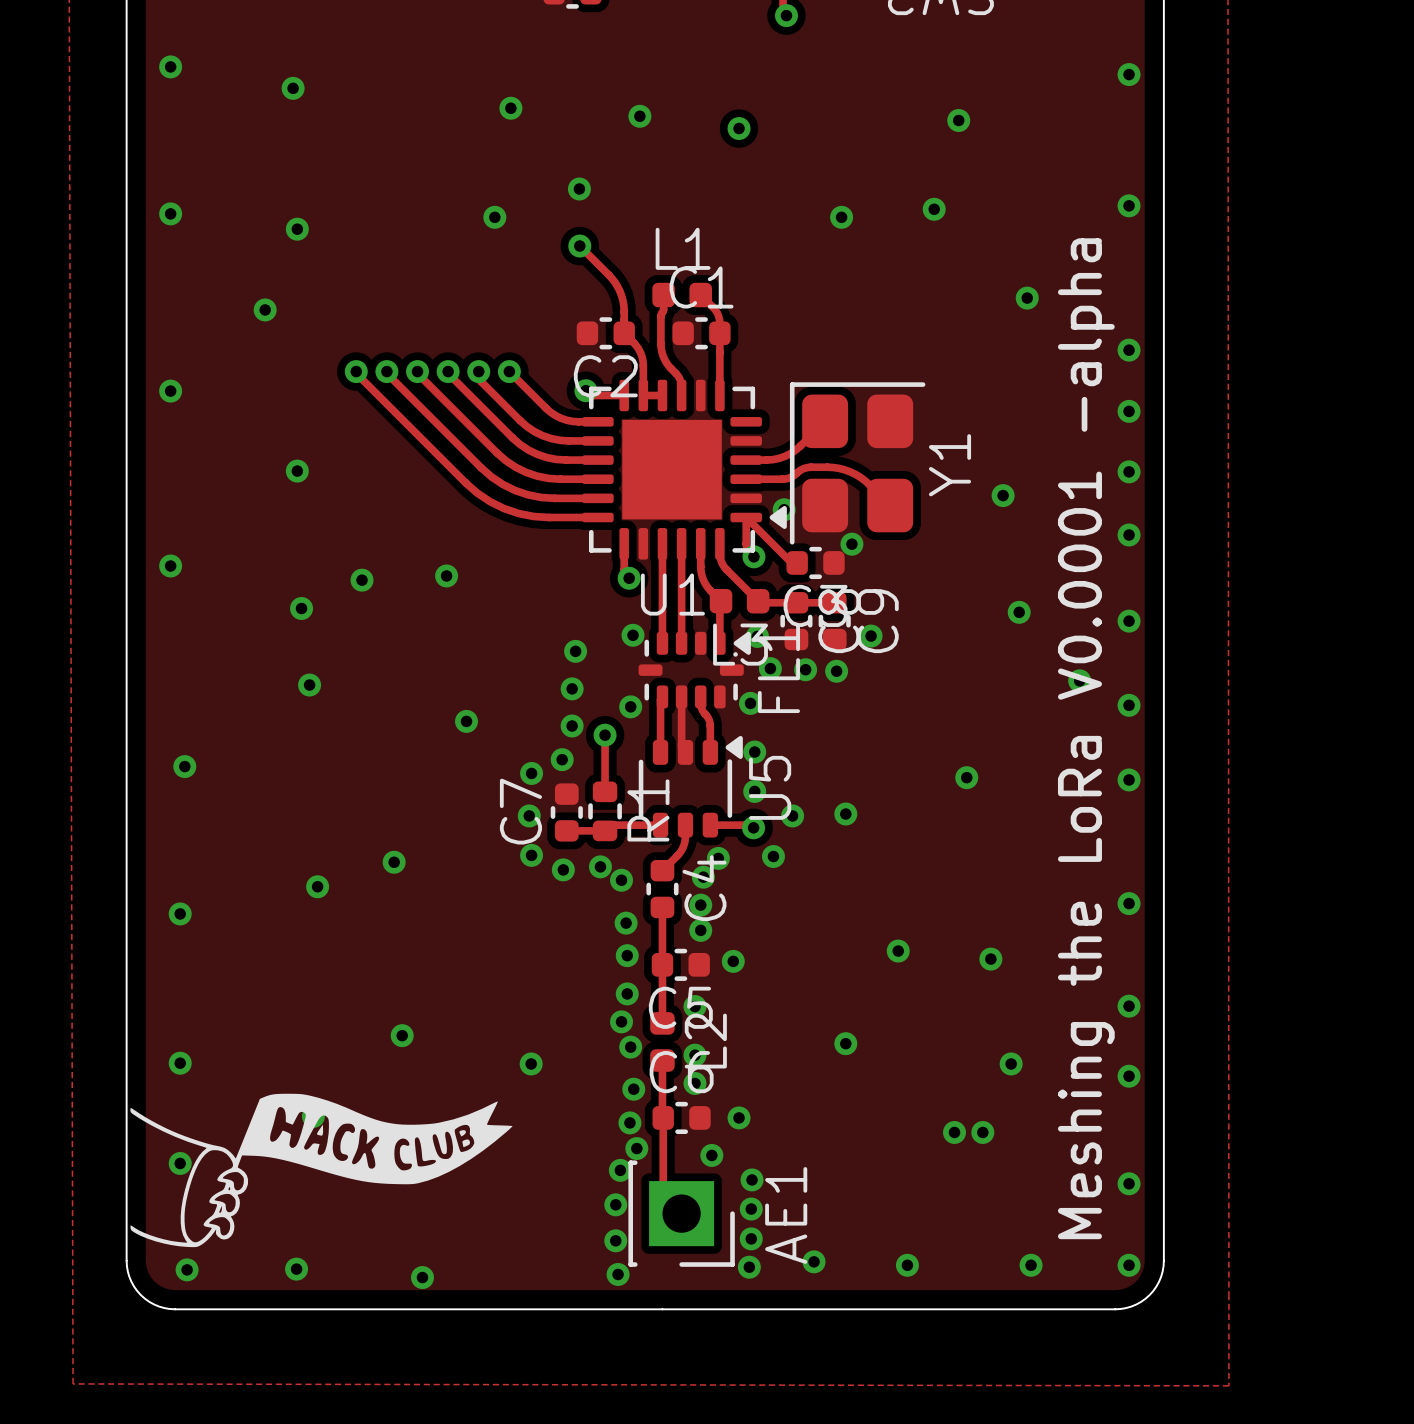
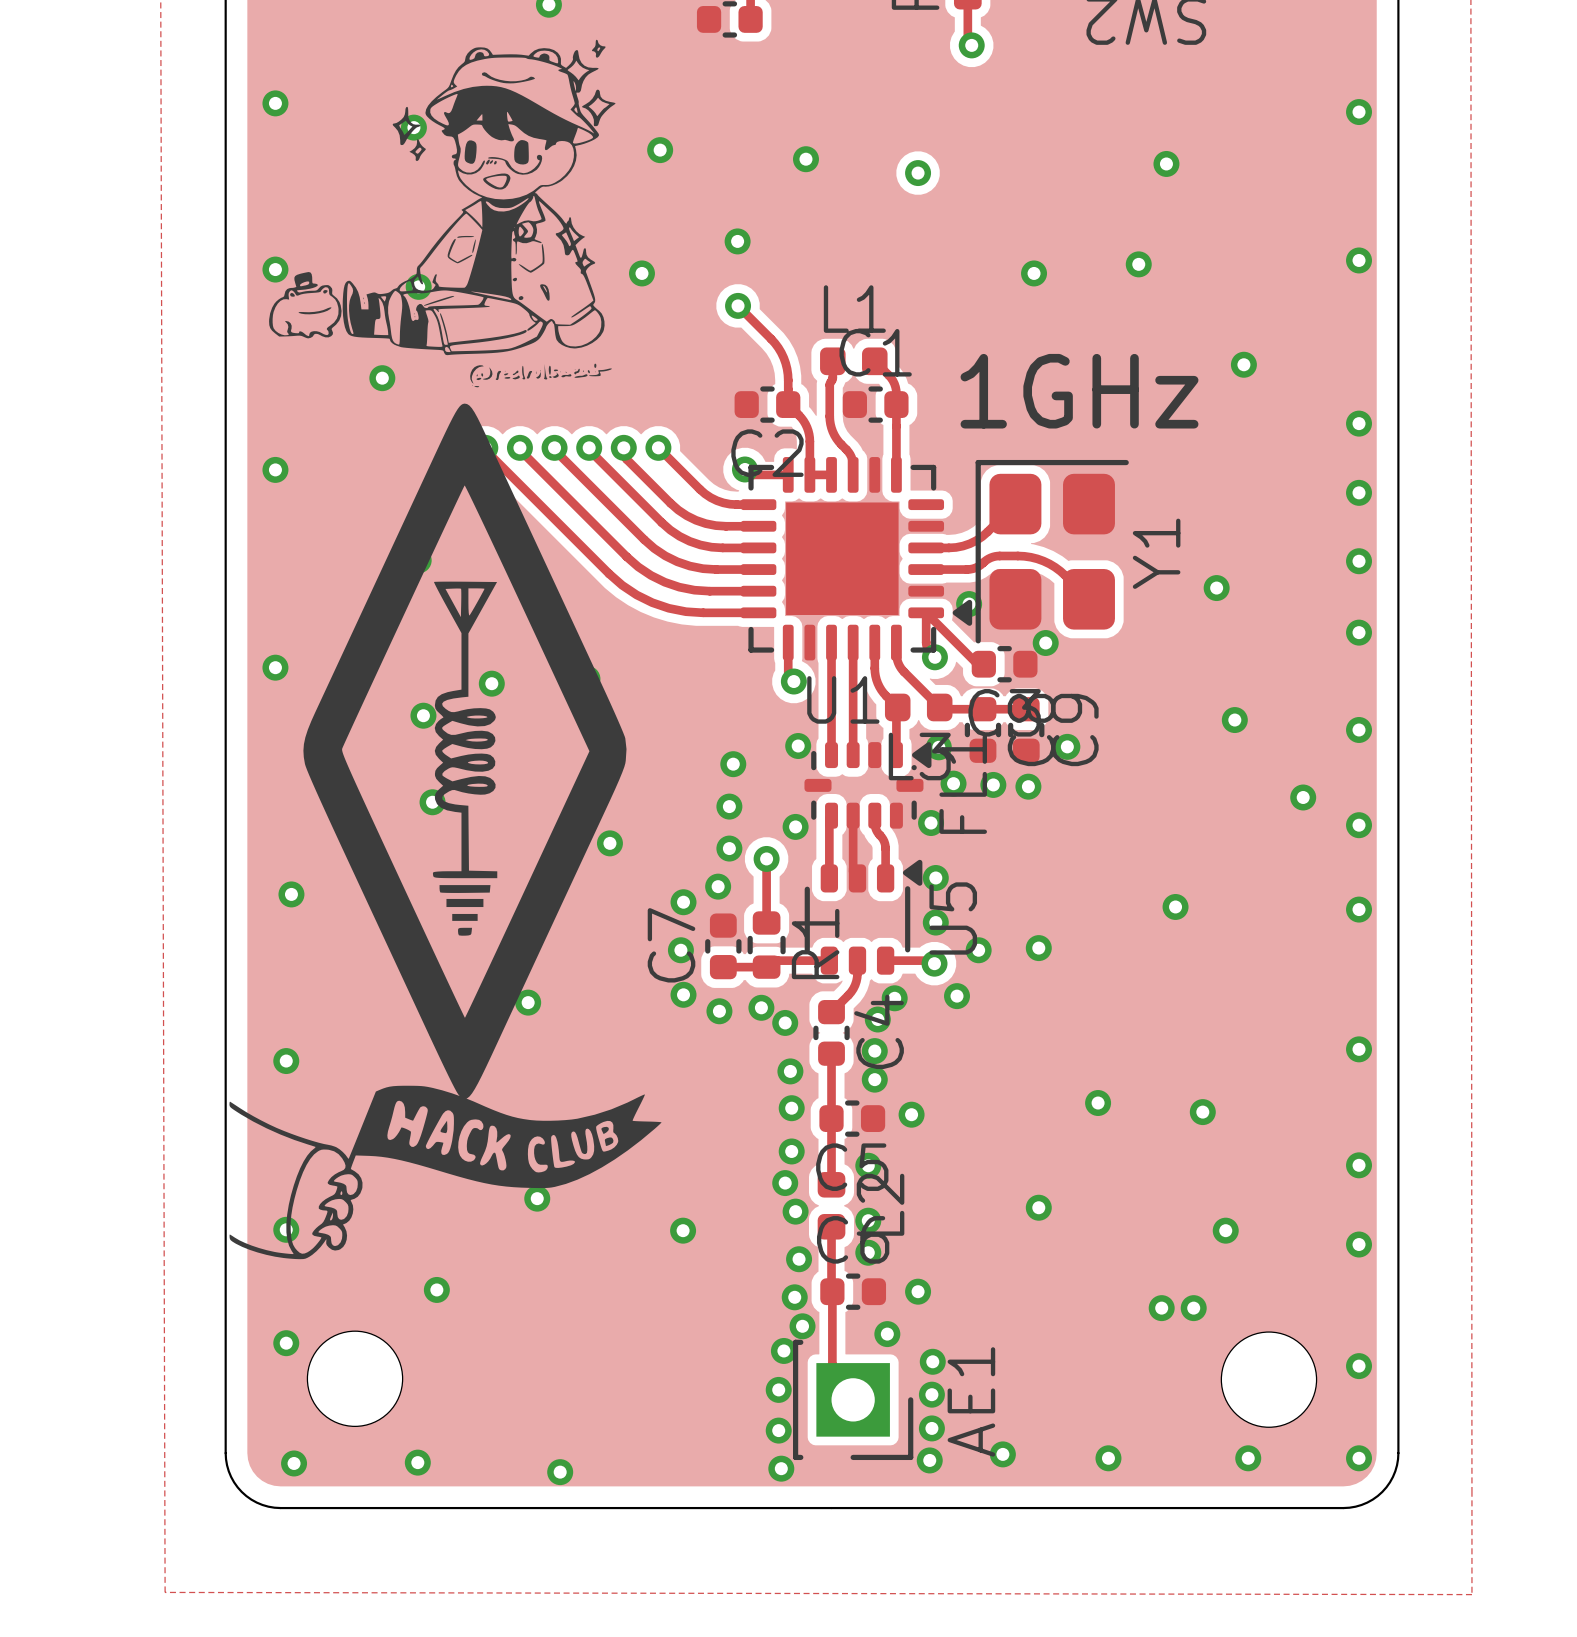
drawing: none -> [269, 39, 627, 1099]
text: none -> 1GHz (1079, 391)
text: Meshing the LoRa V0.0001 -alpha (1086, 738) -> none
drawing position: (321, 1170) -> (445, 1172)
part: none -> (355, 1378)
part: none -> (1268, 1379)

